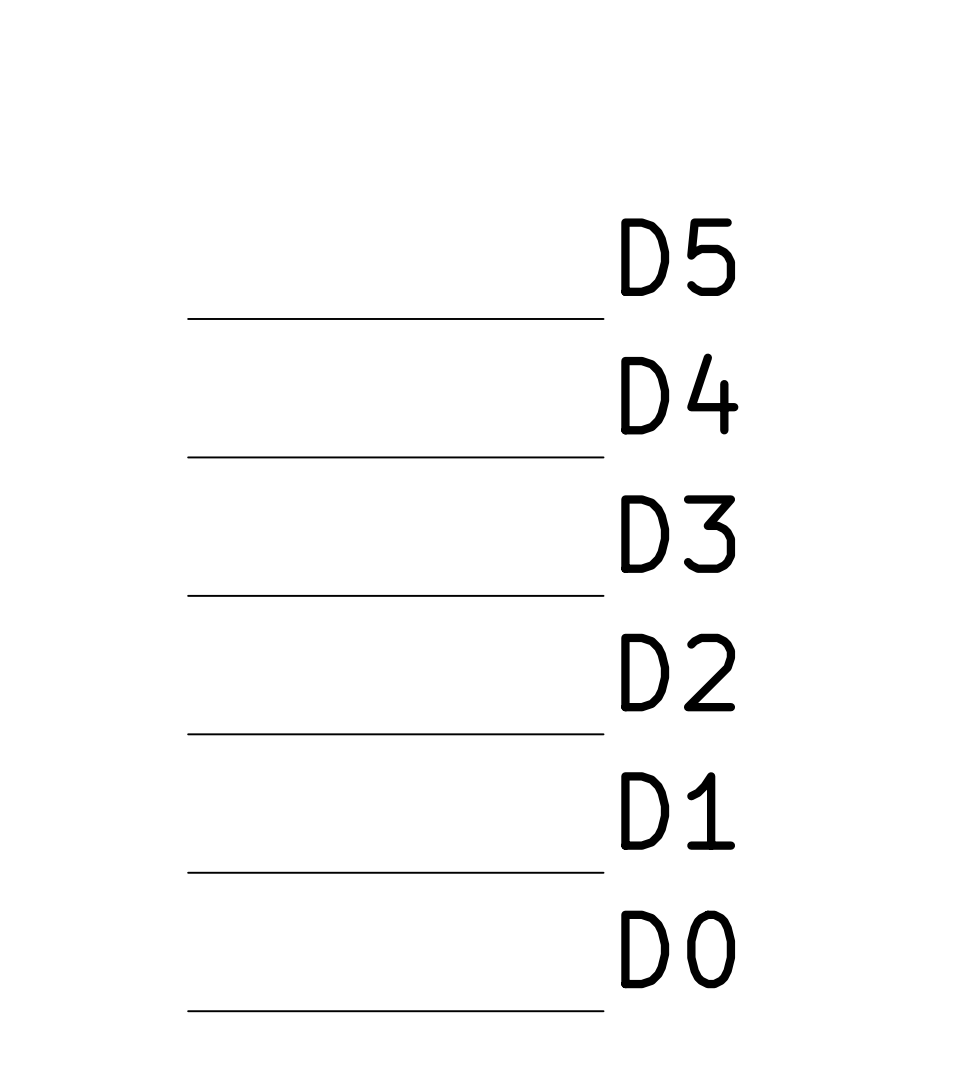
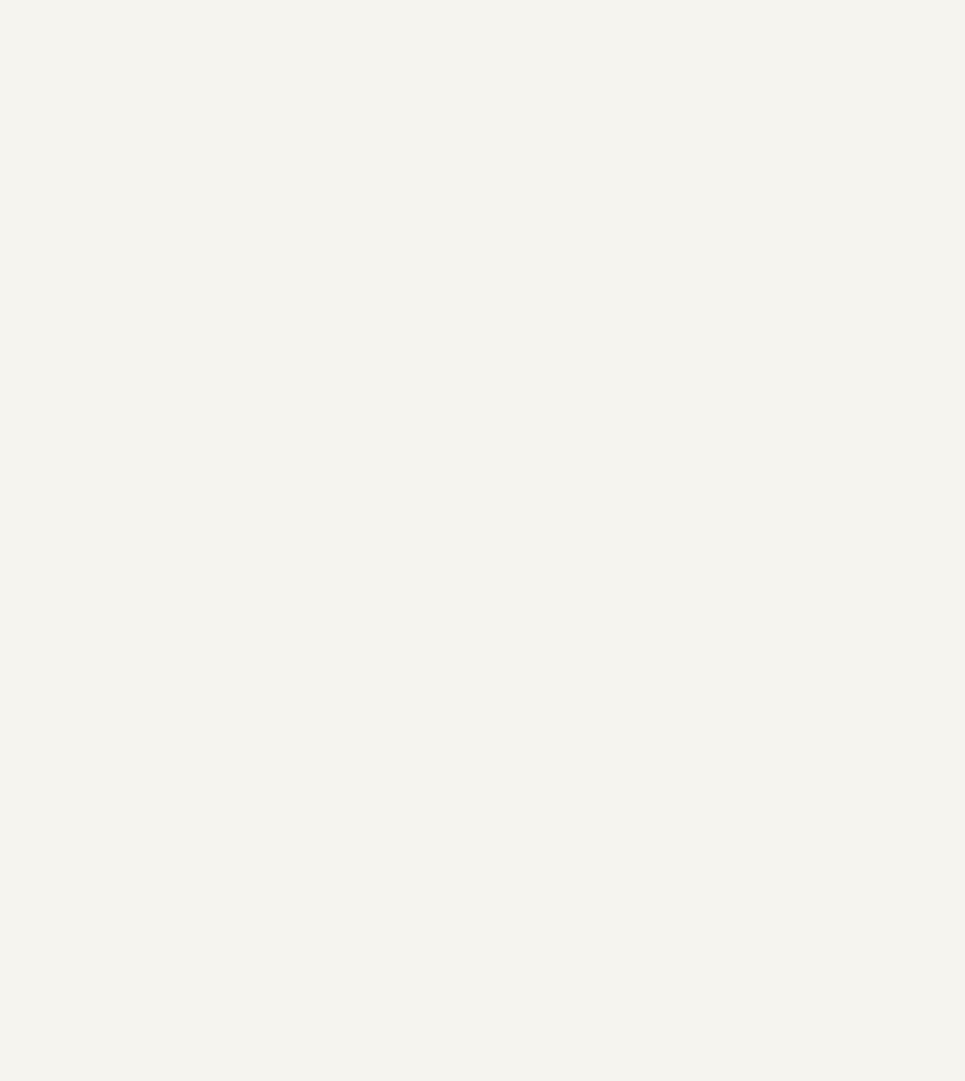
label: D5 (678, 257) -> none
wire: (188, 318) (603, 318) -> none
label: D4 (679, 394) -> none
wire: (188, 457) (603, 457) -> none
label: D3 (678, 534) -> none
wire: (188, 595) (603, 595) -> none
label: D2 (678, 672) -> none
wire: (188, 734) (603, 734) -> none
label: D1 (678, 811) -> none
wire: (188, 872) (603, 872) -> none
label: D0 (678, 949) -> none
wire: (188, 1011) (603, 1011) -> none

